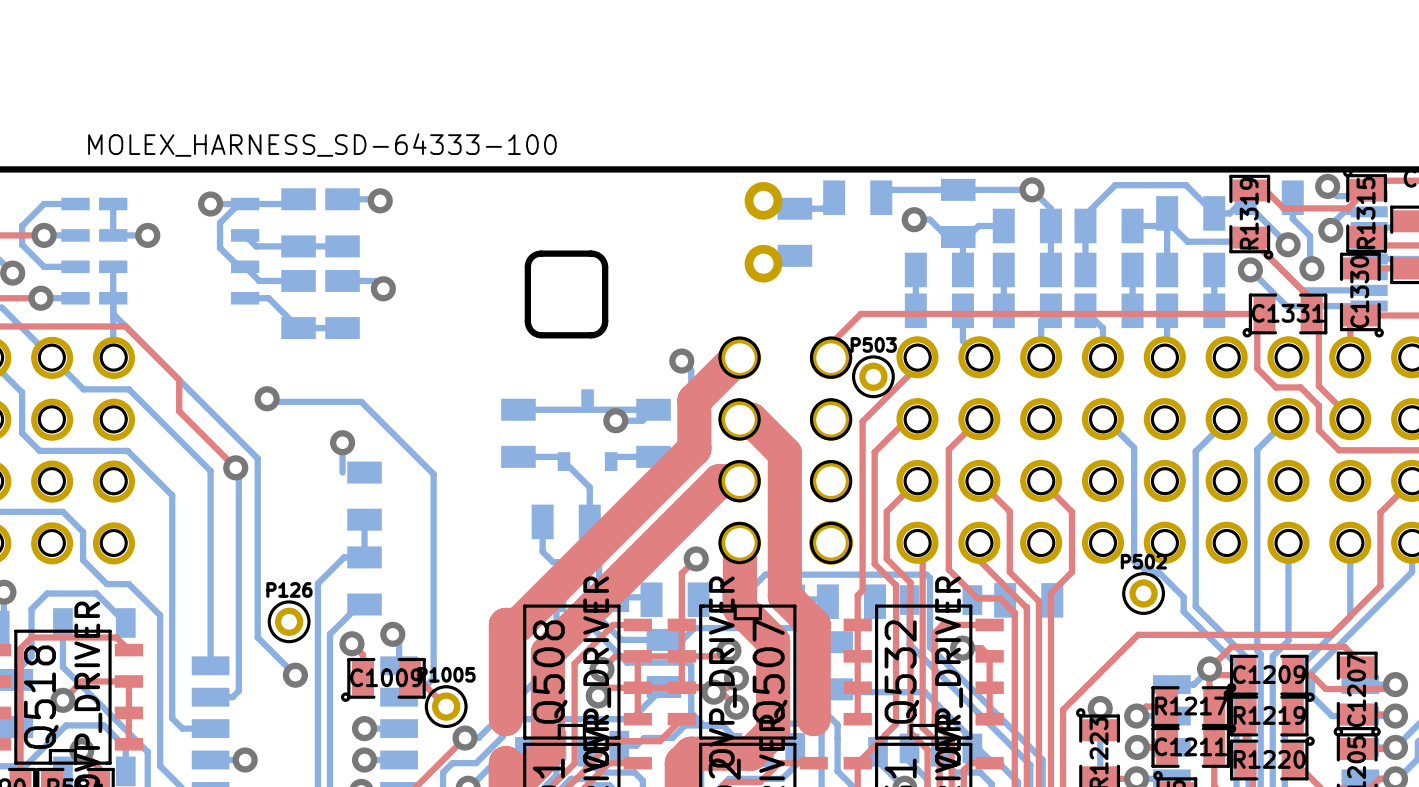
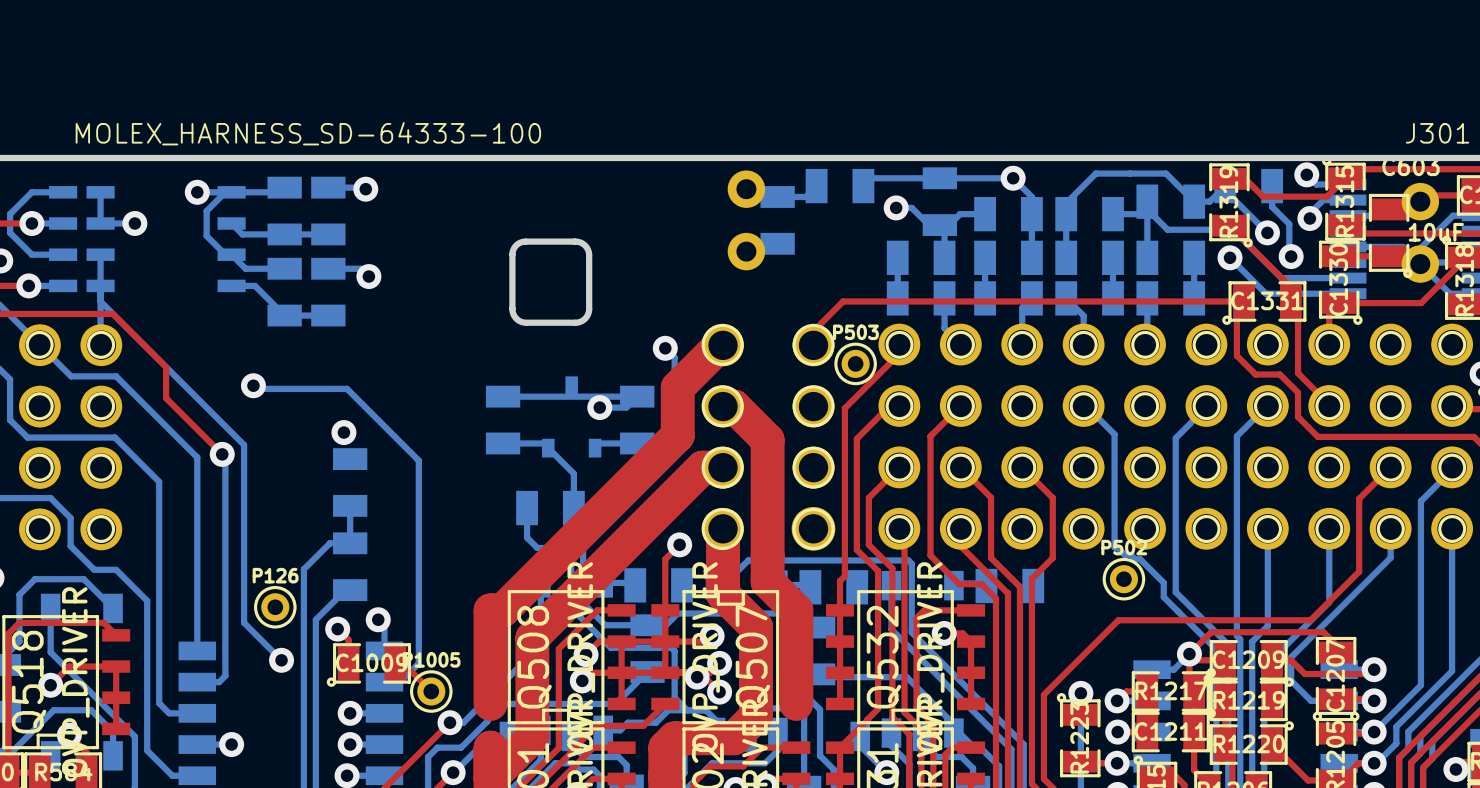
bottom track: (342, 442) (342, 472) -> none
via position: (342, 442) -> (343, 432)

